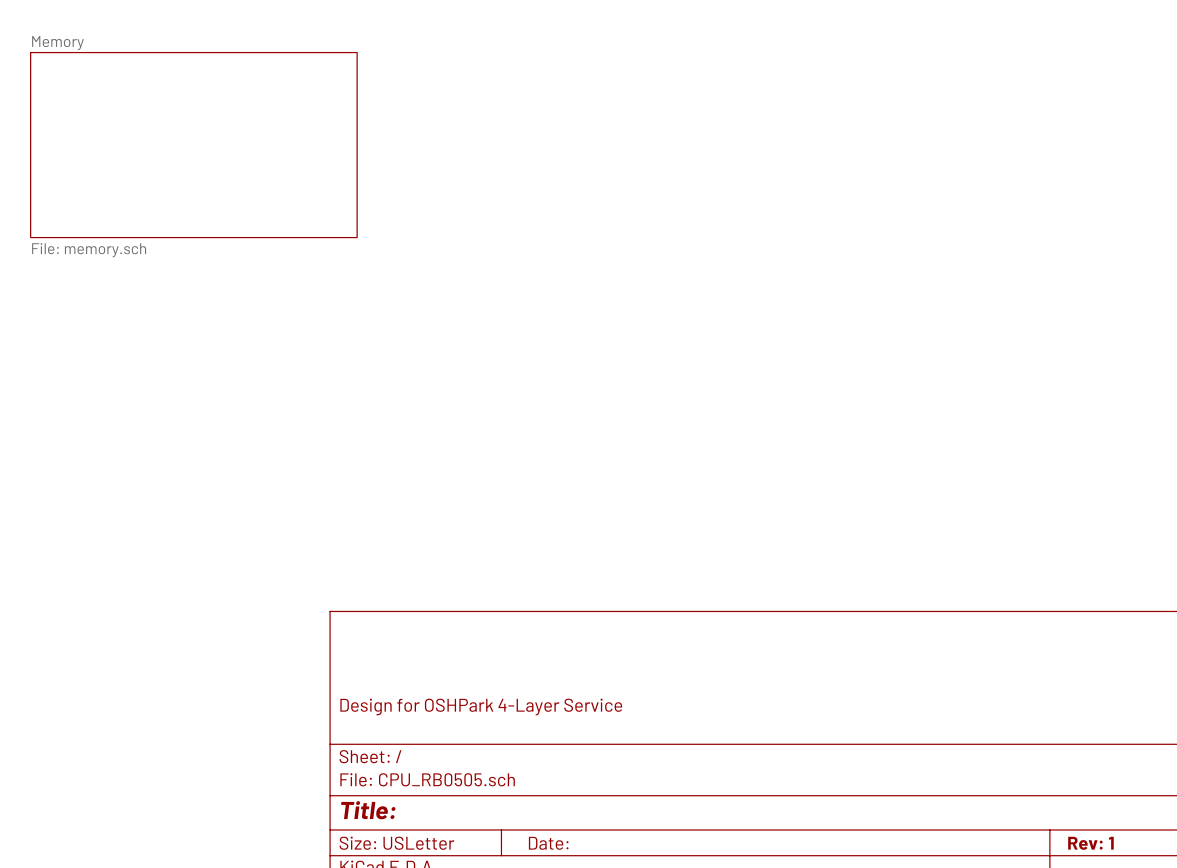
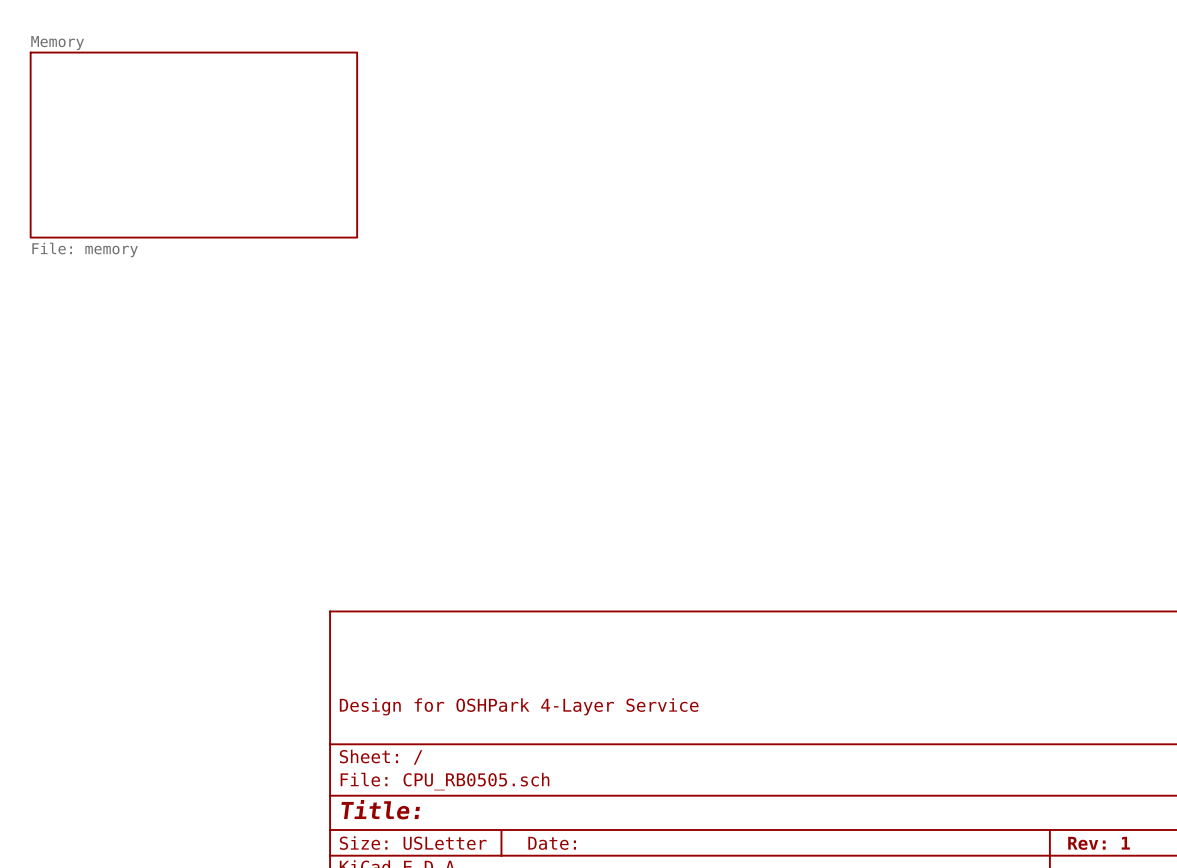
sheet Memory value: File: memory.sch (89, 250) -> File: memory (85, 249)

